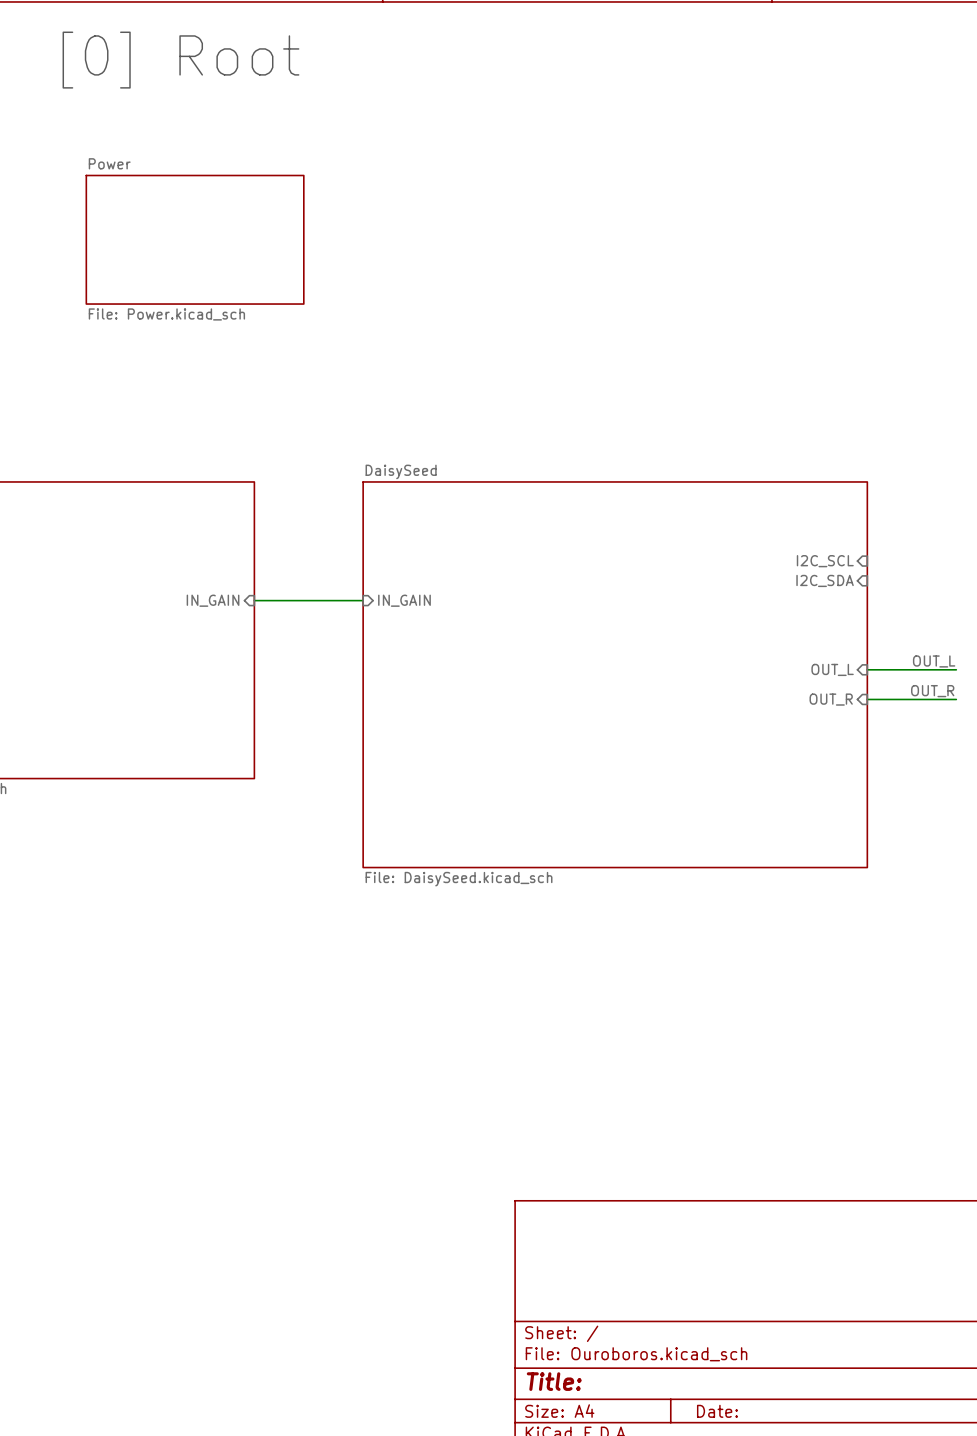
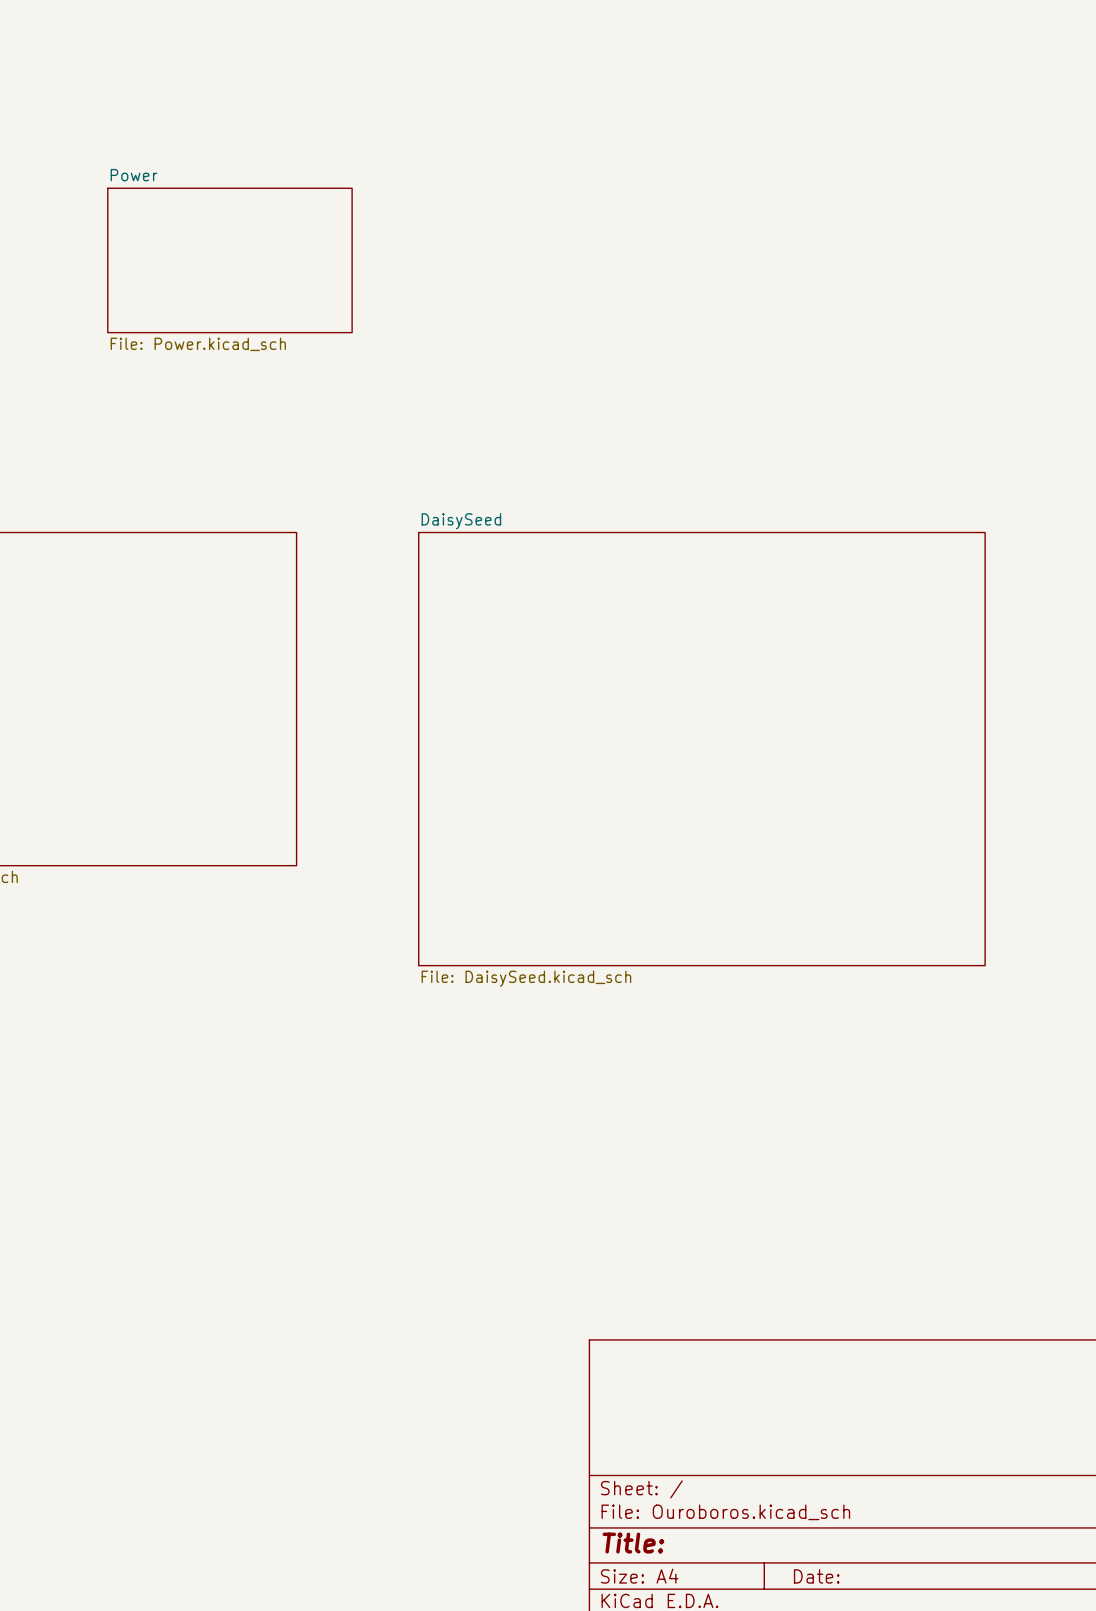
text: [0] Root (180, 60) -> none
sheet pin: I2C_SCL (825, 561) -> none
sheet pin: I2C_SDA (825, 580) -> none
sheet pin: IN_GAIN (213, 600) -> none
wire: (254, 600) (363, 600) -> none
sheet pin: IN_GAIN (404, 600) -> none
label: OUT_L (934, 661) -> none
sheet pin: OUT_L (832, 669) -> none
wire: (867, 669) (956, 669) -> none
label: OUT_R (932, 691) -> none
sheet pin: OUT_R (831, 699) -> none
wire: (867, 699) (956, 699) -> none

